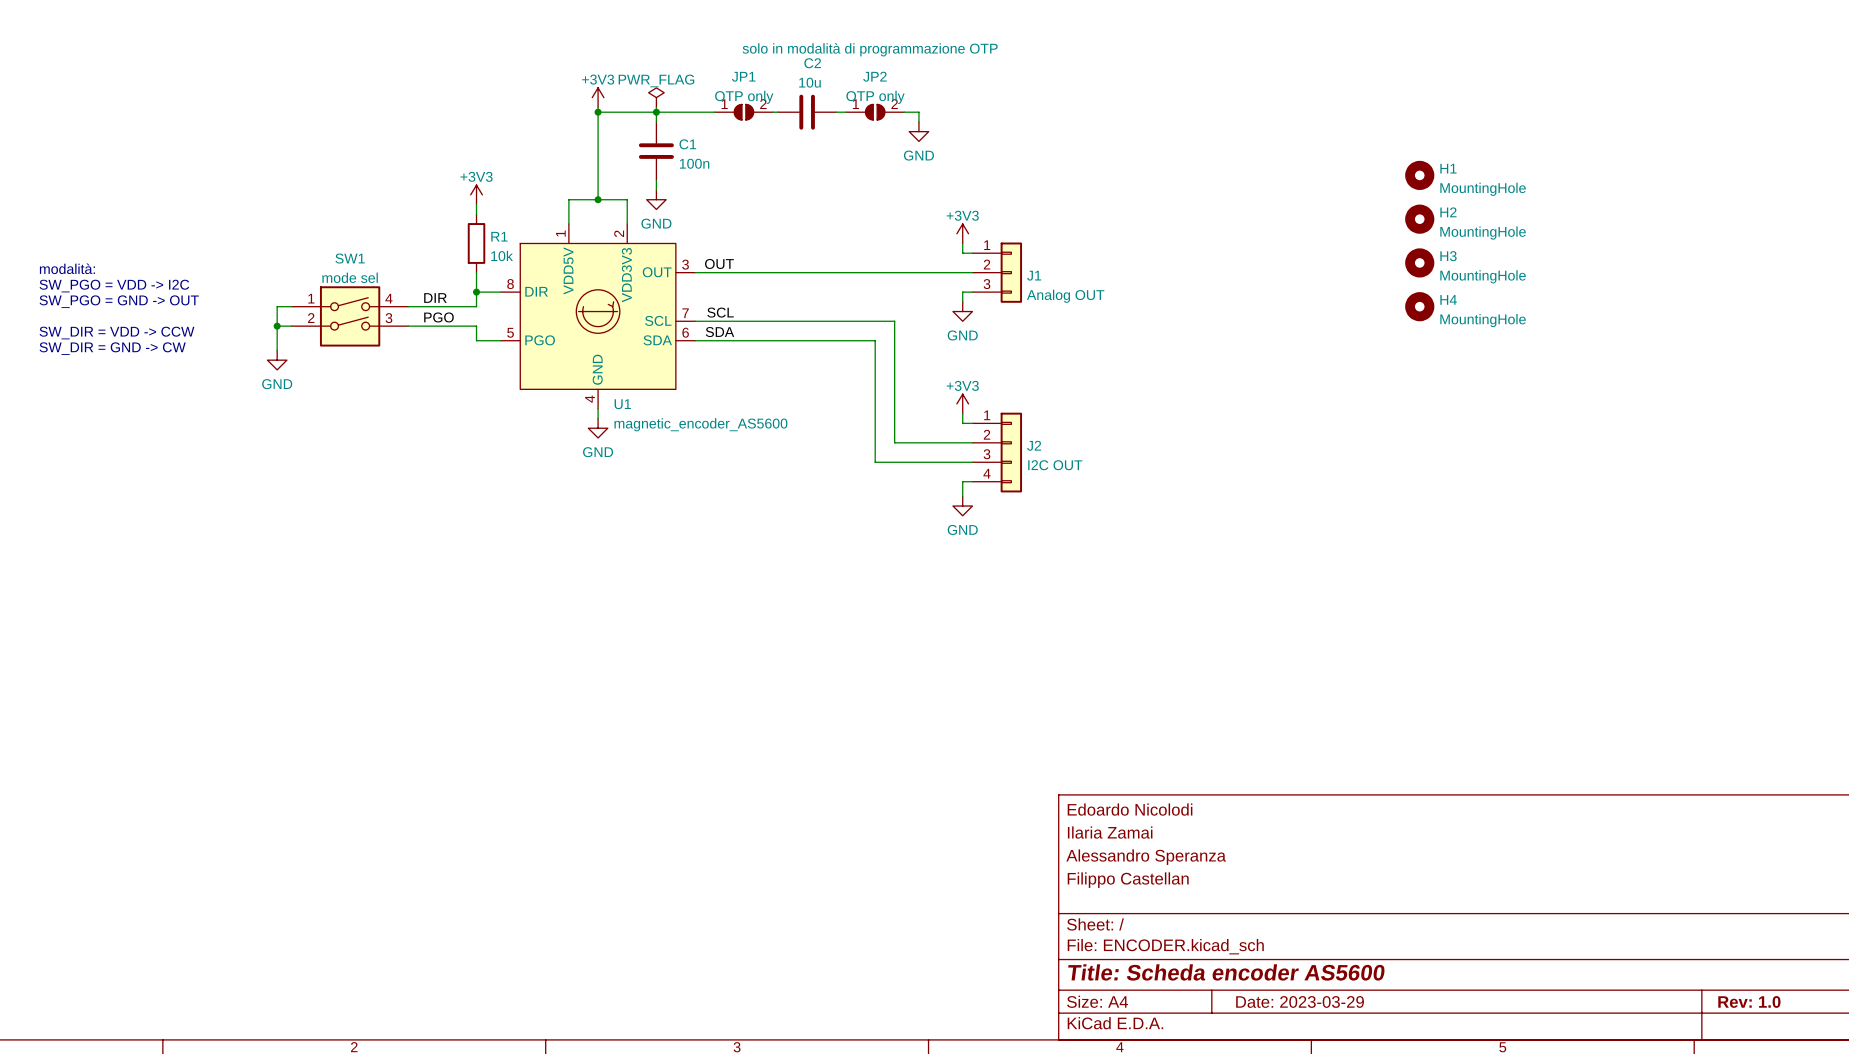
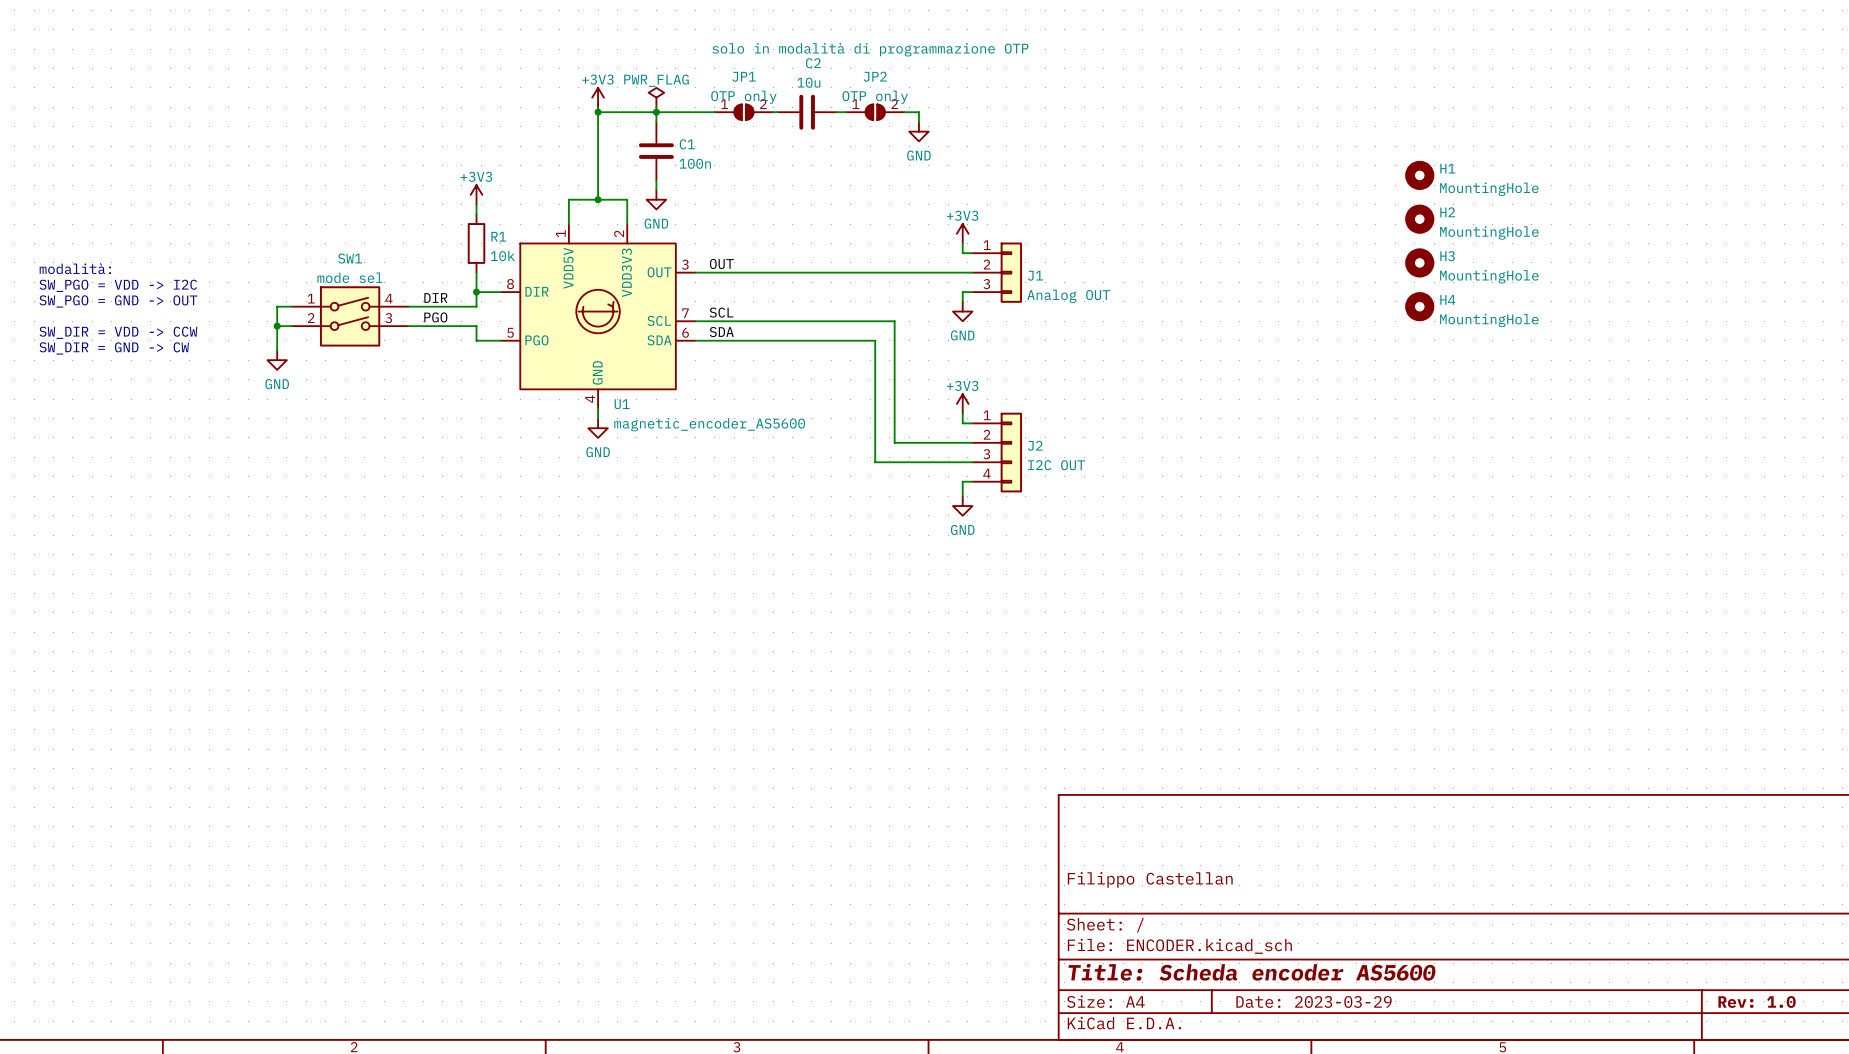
title block: Edoardo Nicolodi (1130, 809) -> none
title block: Ilaria Zamai (1110, 832) -> none
title block: Alessandro Speranza (1146, 857) -> none

